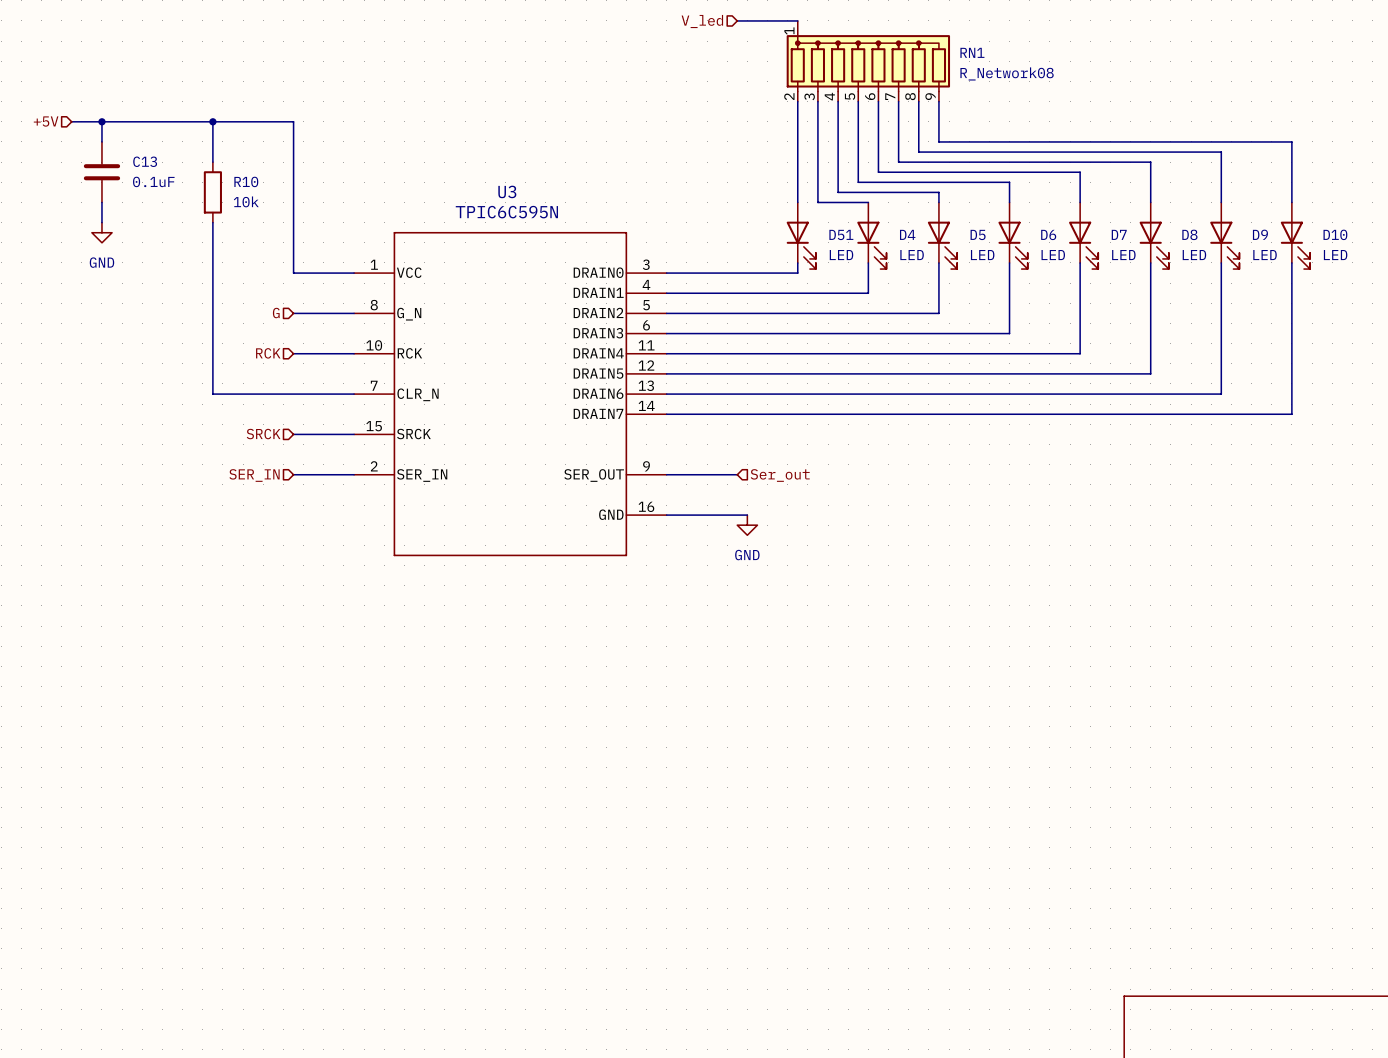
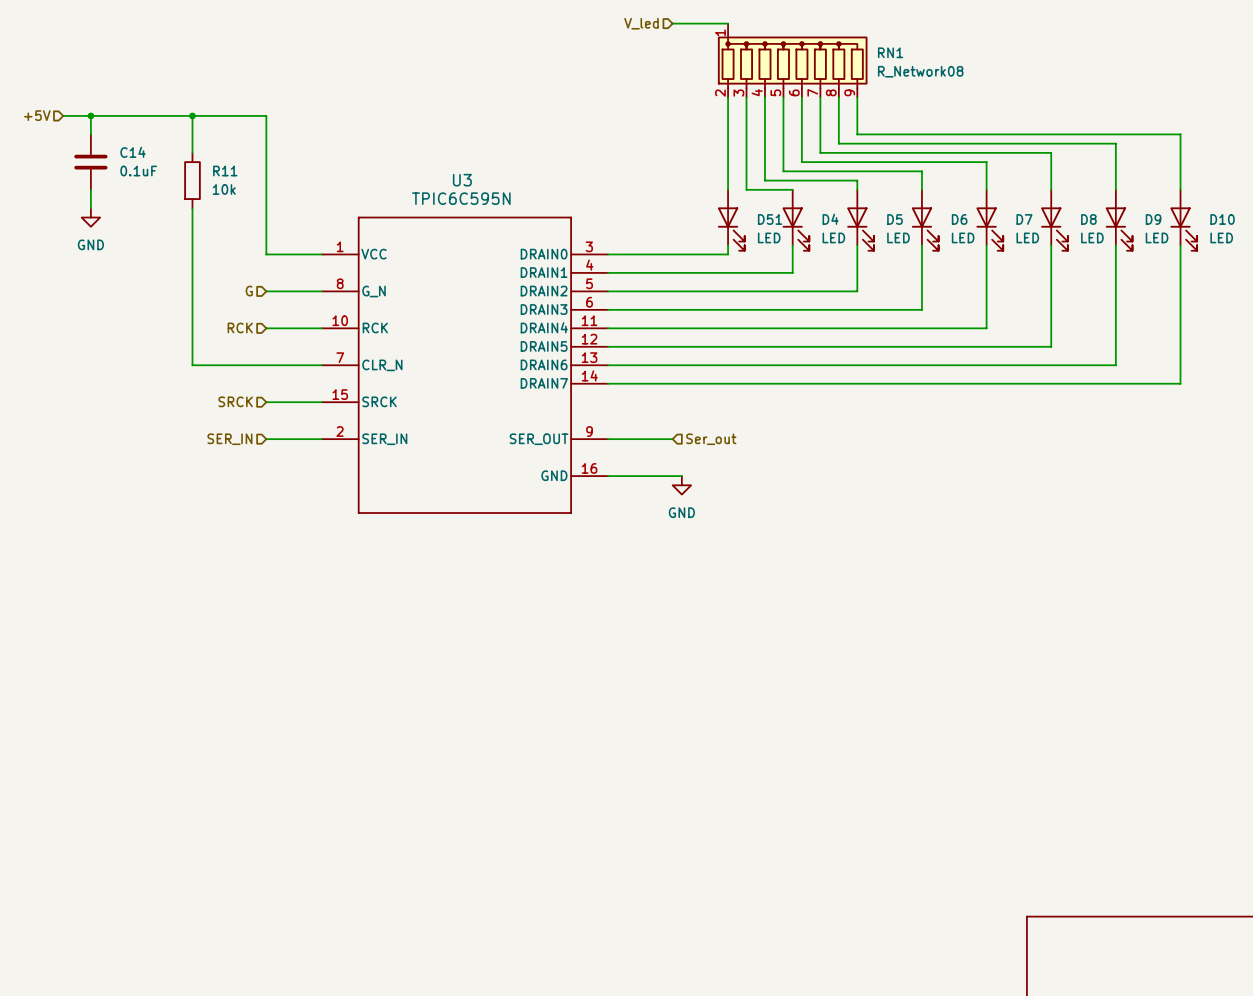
C13 name: C13 (145, 161) -> C14 (132, 152)
R10 name: R10 (246, 181) -> R11 (225, 171)

